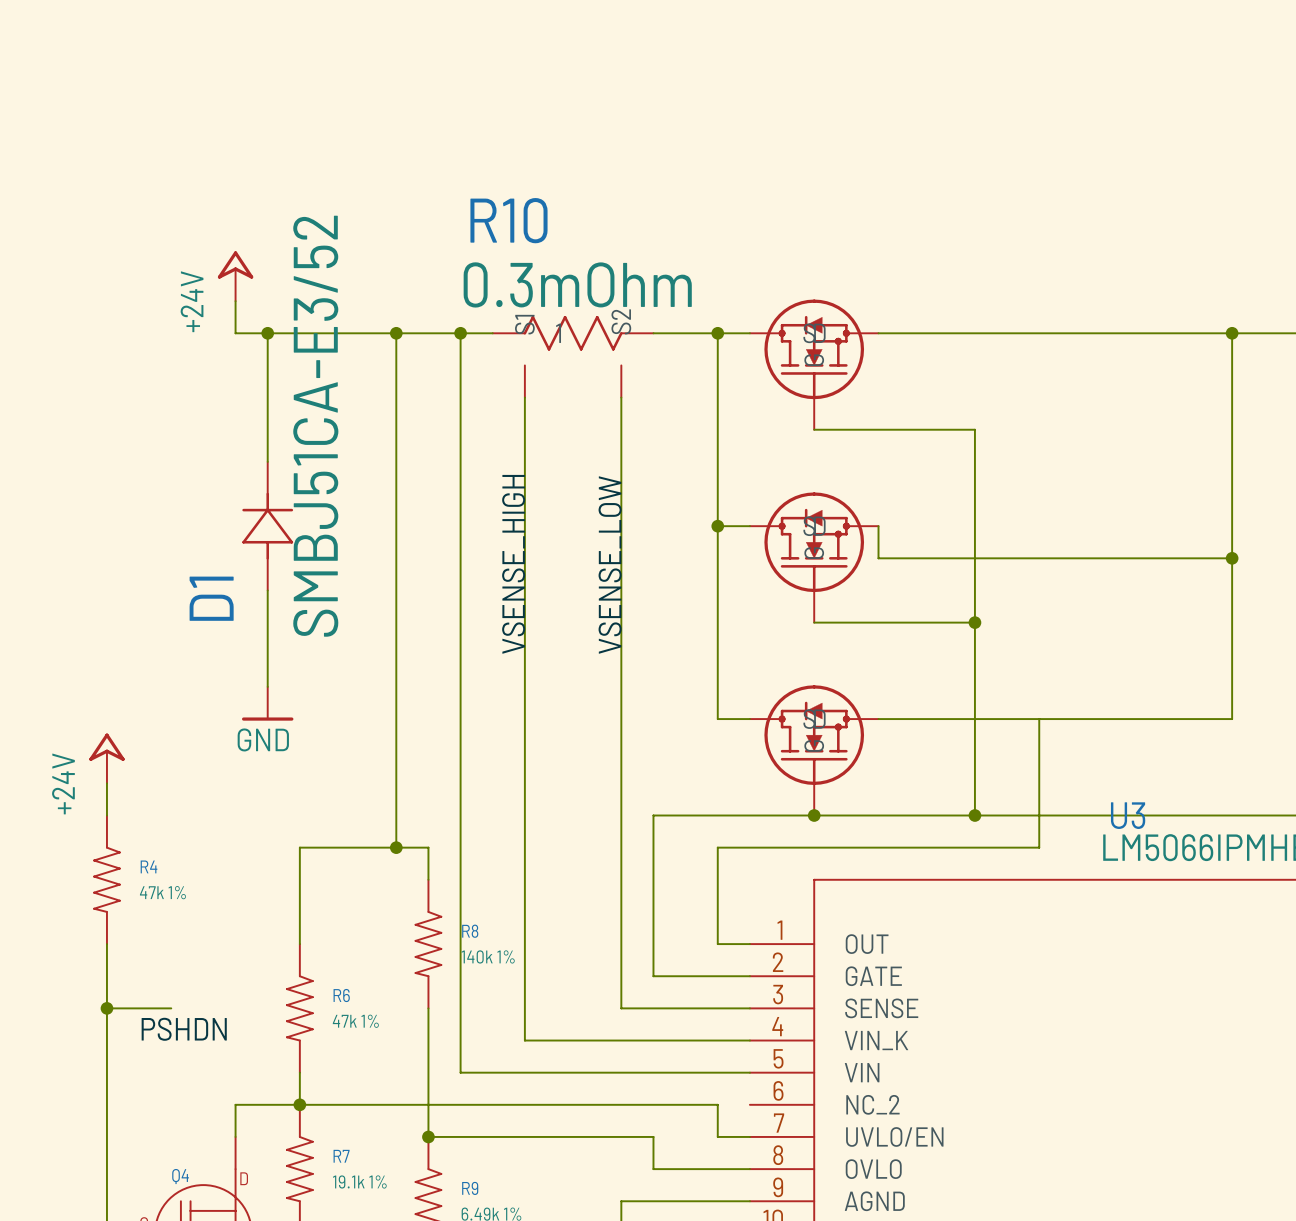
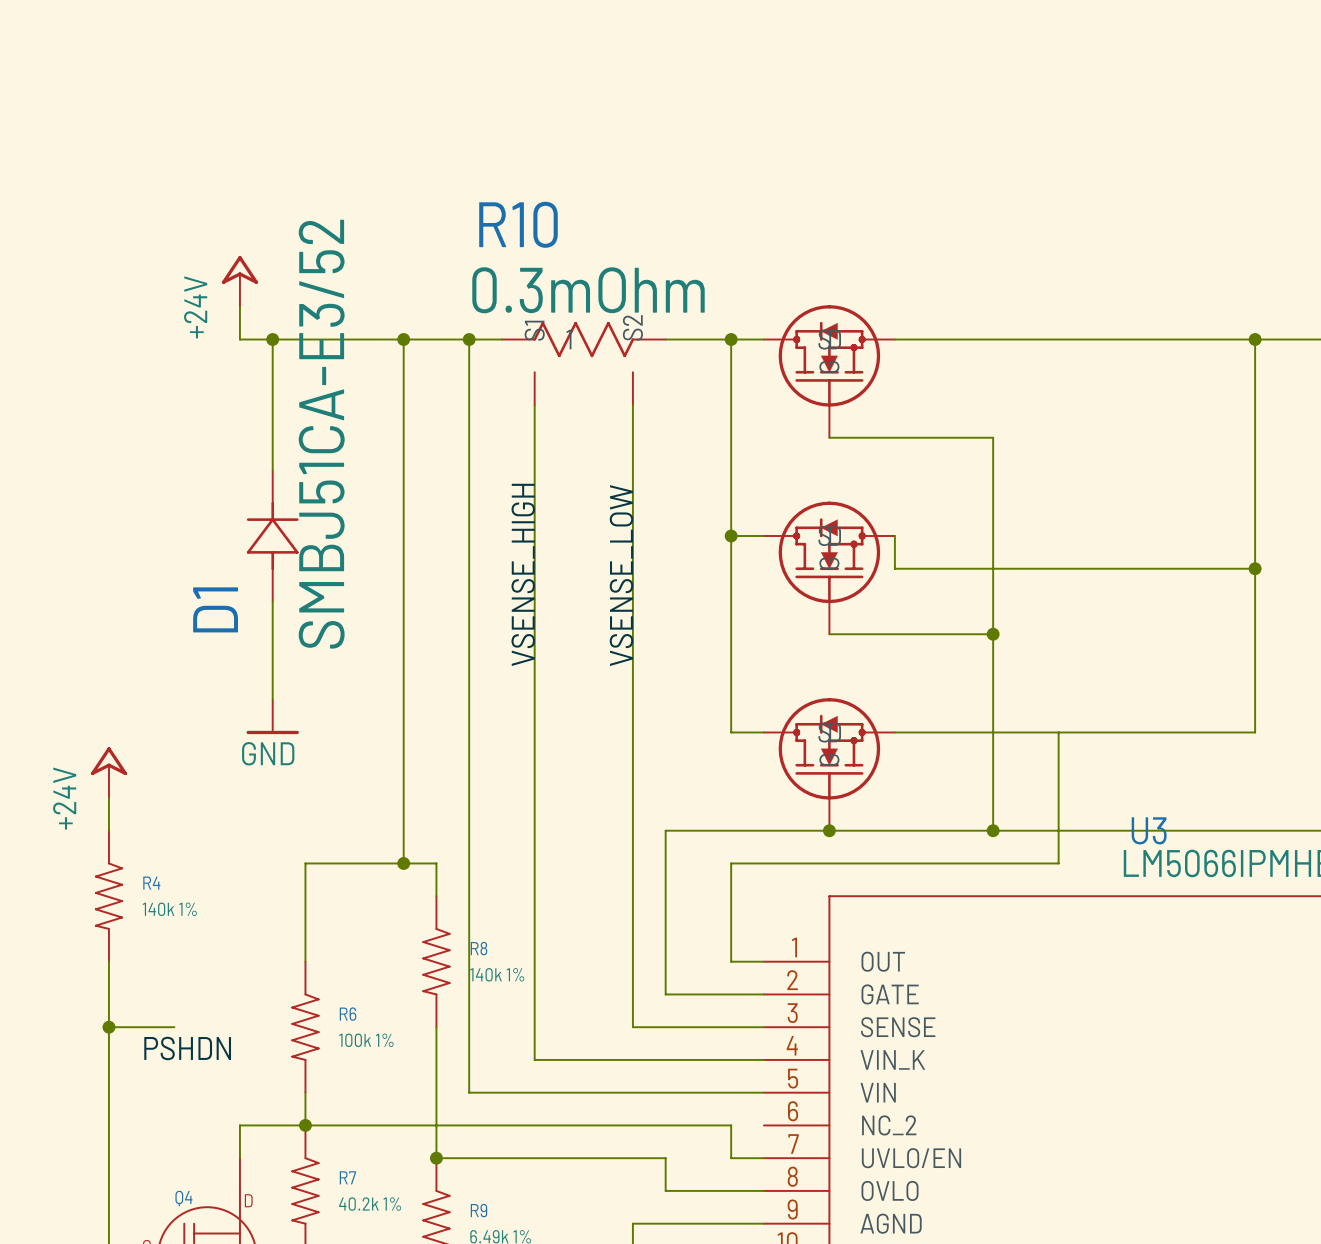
R4 value: 47k 1% (162, 892) -> 140k 1% (169, 909)
R6 value: 47k 1% (355, 1021) -> 100k 1% (366, 1040)
R7 value: 19.1k 1% (359, 1181) -> 40.2k 1% (370, 1204)

